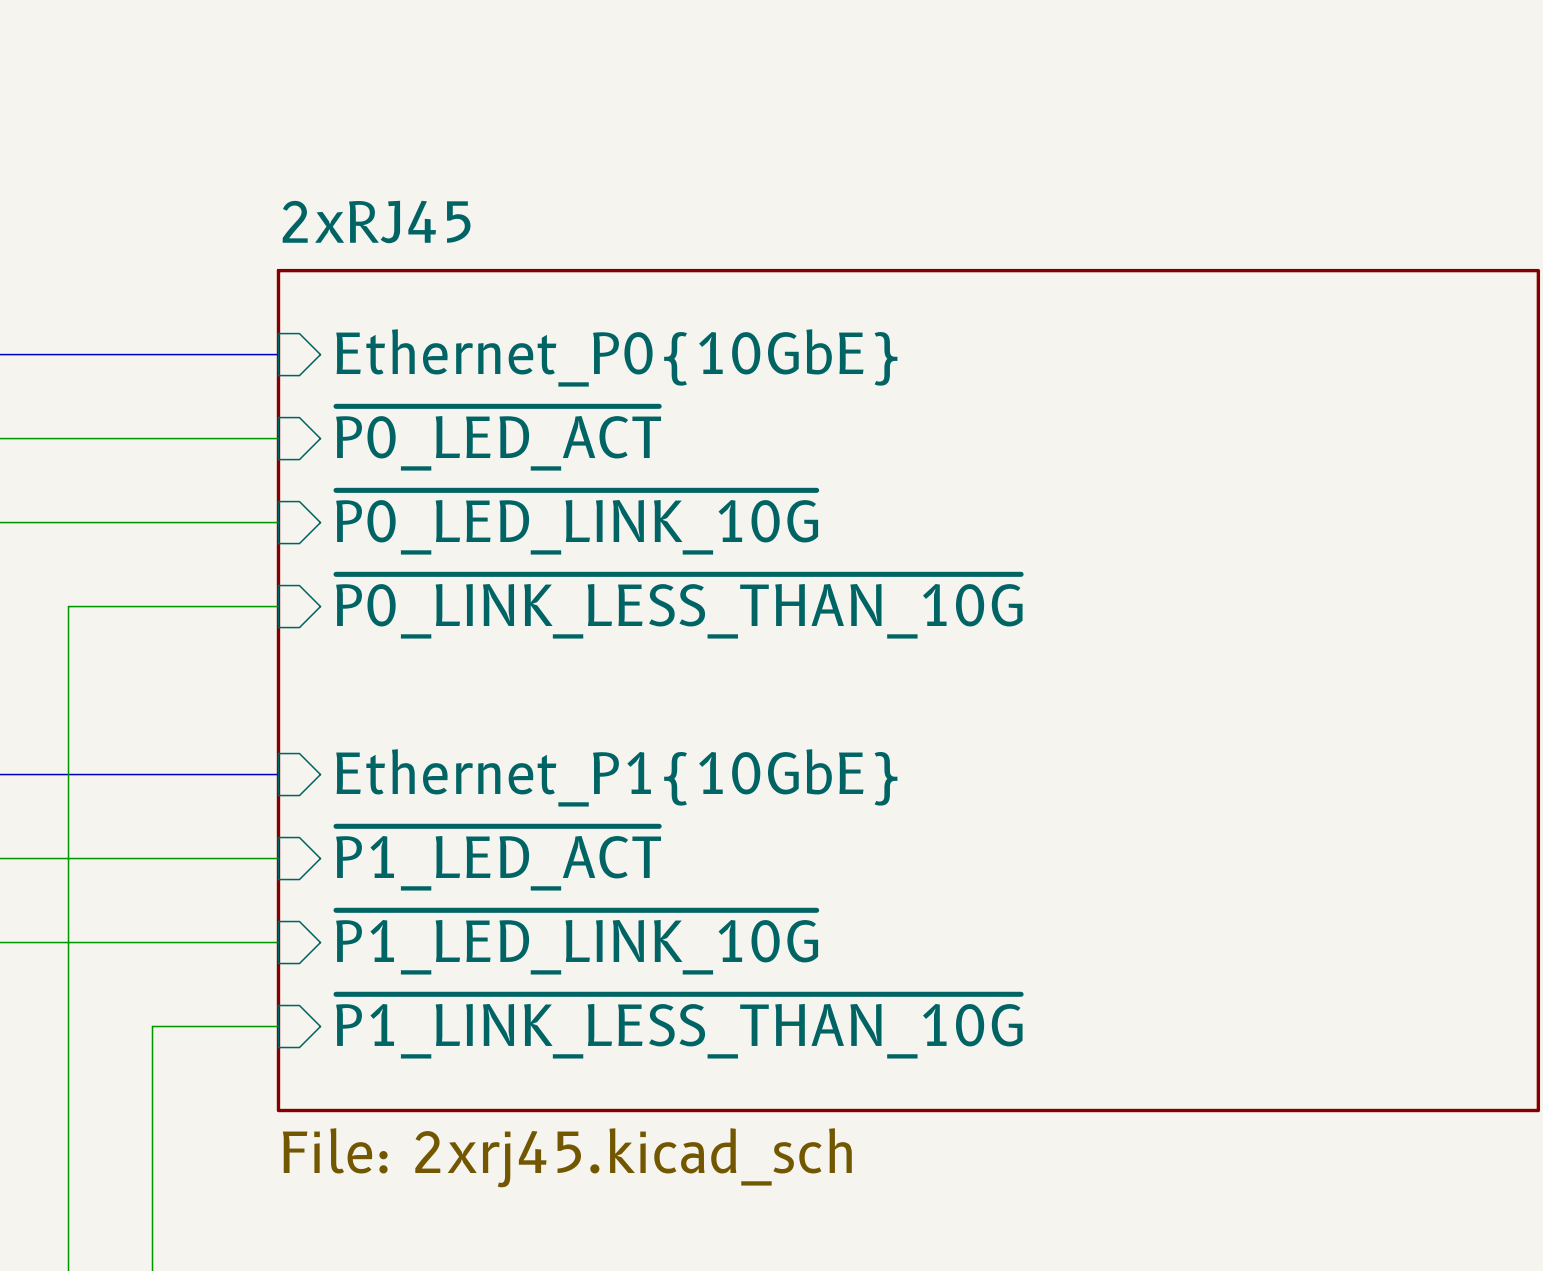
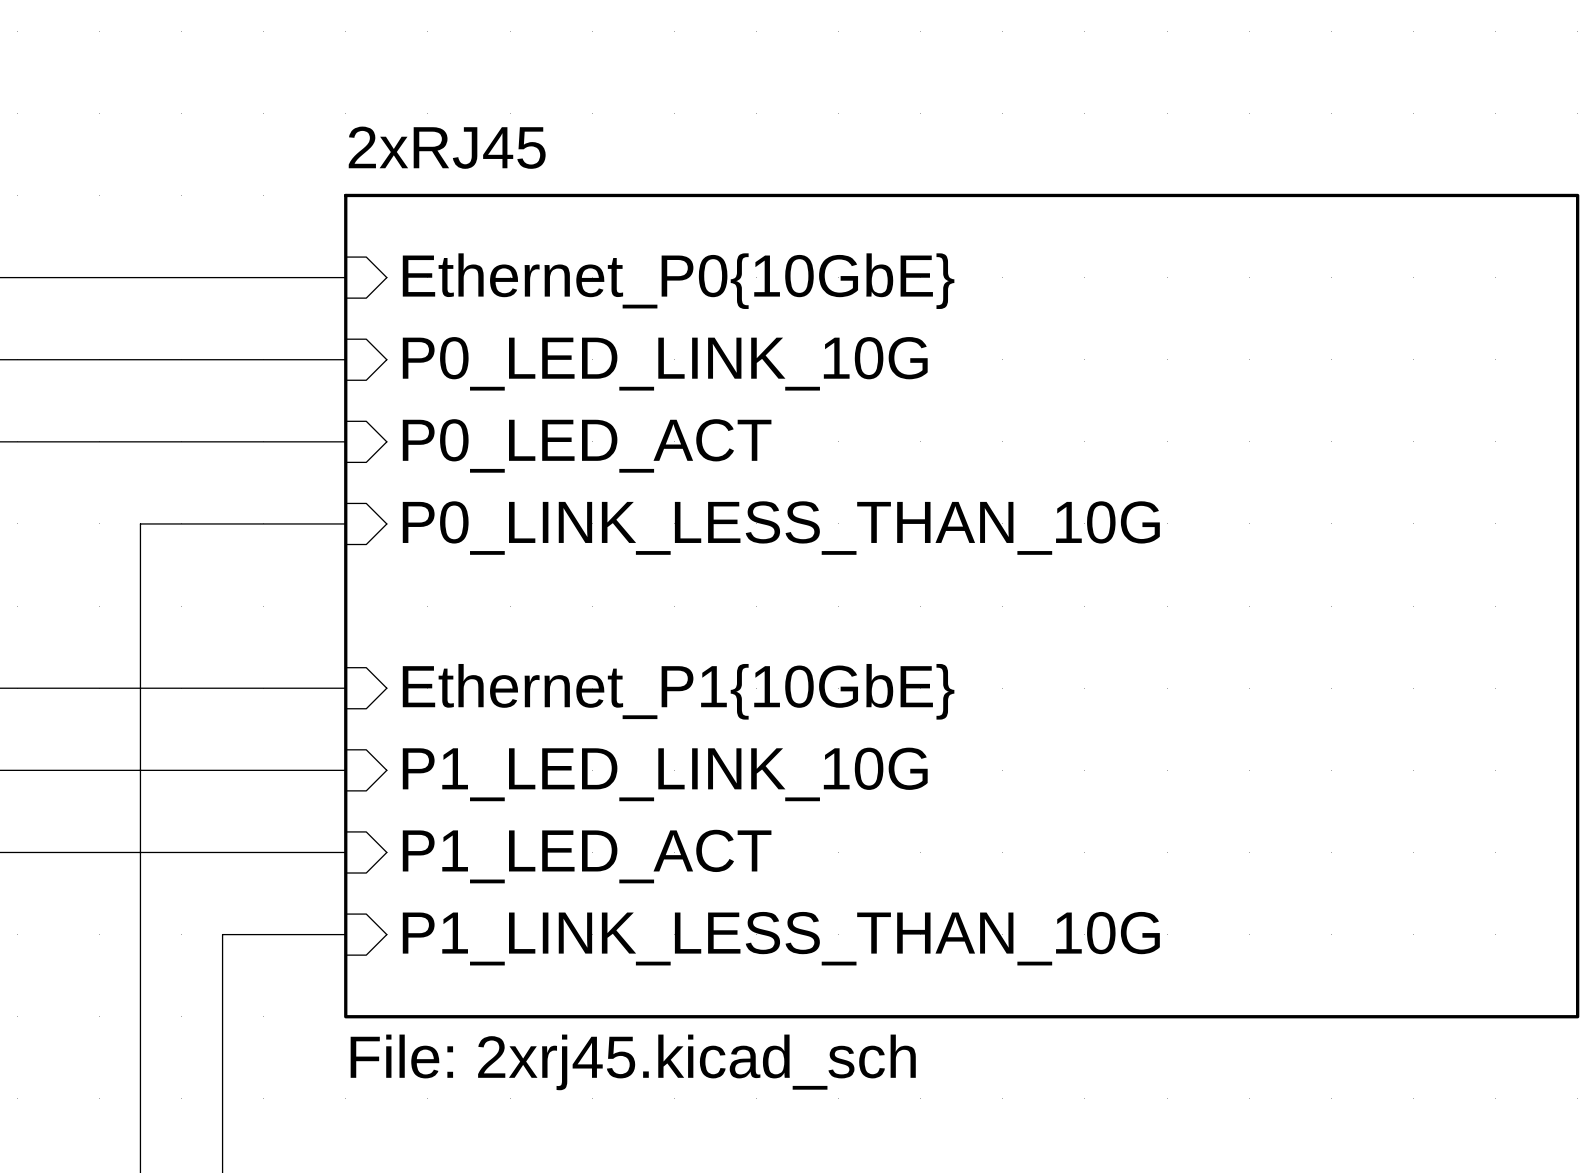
sheet pin: ~{P0_LED_ACT} (498, 438) -> P0_LED_LINK_10G (665, 363)
sheet pin: ~{P0_LED_LINK_10G} (577, 522) -> P0_LED_ACT (587, 445)
sheet pin: ~{P0_LINK_LESS_THAN_10G} (679, 606) -> P0_LINK_LESS_THAN_10G (781, 528)
sheet pin: ~{P1_LED_ACT} (498, 858) -> P1_LED_LINK_10G (665, 774)
sheet pin: ~{P1_LED_LINK_10G} (577, 942) -> P1_LED_ACT (587, 856)
sheet pin: ~{P1_LINK_LESS_THAN_10G} (679, 1026) -> P1_LINK_LESS_THAN_10G (781, 938)

